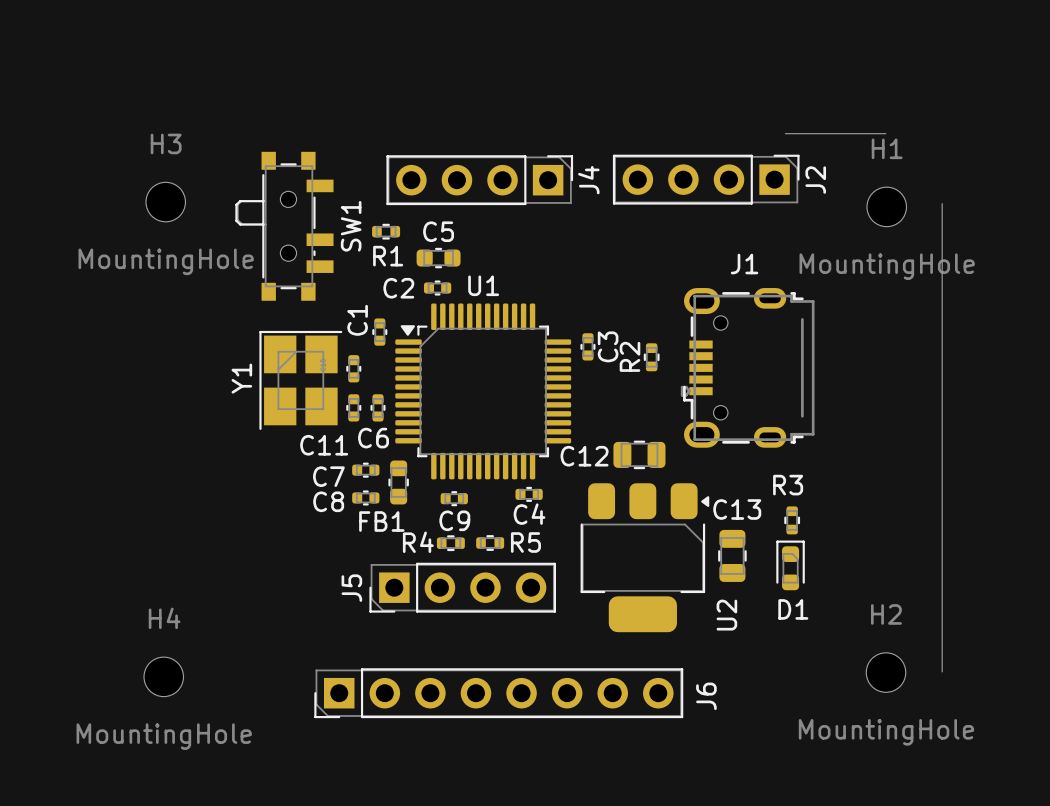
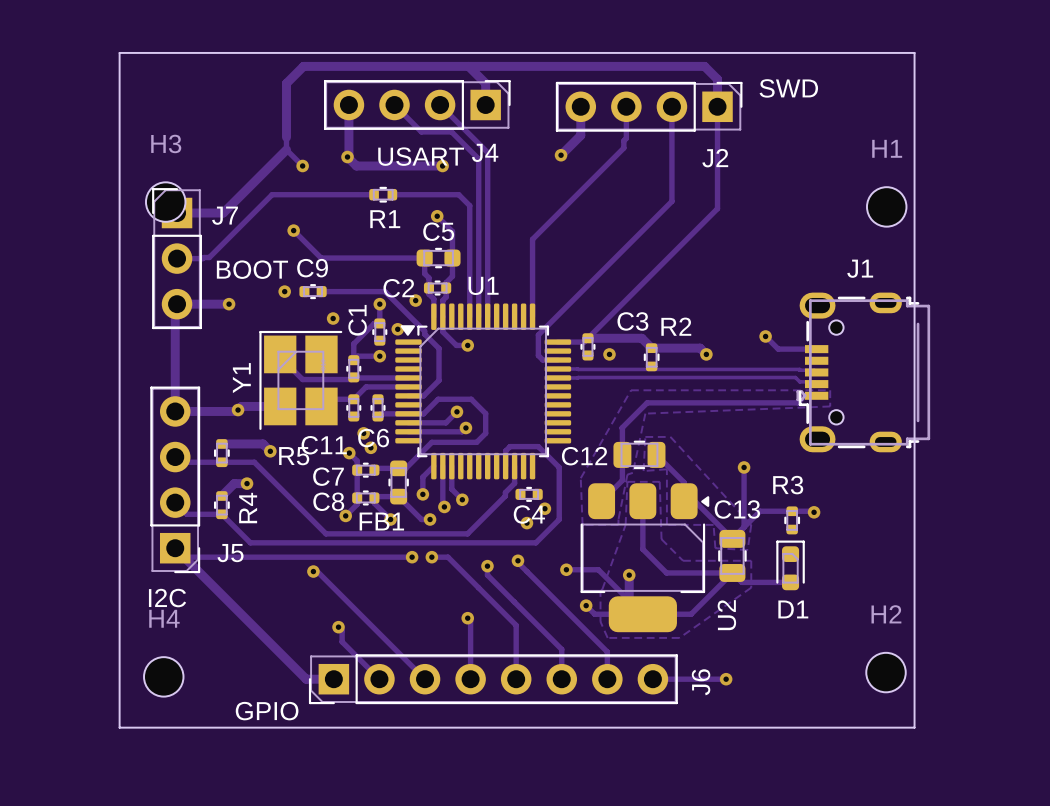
board edge: none -> (119, 52) (914, 52) (914, 727) (119, 727) (119, 52)
track: none -> (468, 66) (485, 83) (485, 104)
text: none -> SWD (788, 88)
track: none -> (348, 104) (347, 157) (356, 165) (442, 165)
track: none -> (394, 104) (421, 131) (451, 131) (478, 159) (478, 316)
track: none -> (440, 104) (487, 152) (487, 316)
track: none -> (580, 106) (580, 135) (561, 155)
track: none -> (626, 106) (626, 138) (623, 140) (623, 148) (532, 239) (532, 316)
track: none -> (671, 106) (671, 201) (538, 334) (538, 355) (542, 360) (557, 360)
board edge: (785, 133) (885, 133) -> none
track: none -> (286, 149) (302, 165)
track: none -> (286, 149) (286, 83) (303, 66) (704, 66) (717, 79) (717, 208) (584, 342) (557, 342)
track: none -> (286, 149) (223, 213) (177, 213)
via: none -> (561, 155)
text: none -> USART (421, 156)
via: none -> (347, 157)
via: none -> (302, 165)
via: none -> (442, 165)
J2 position: (706, 179) -> (649, 106)
J4 position: (479, 180) -> (417, 104)
J4 name rotation: 0° (588, 180) -> 90° clockwise (485, 152)
J4 name position: J4 (588, 180) -> J4 (485, 152)
J2 name rotation: 0° (815, 180) -> 90° clockwise (715, 158)
J2 name position: J2 (815, 180) -> J2 (715, 158)
track: none -> (374, 194) (272, 194) (209, 257) (177, 258)
track: none -> (392, 194) (458, 194) (469, 205) (469, 316)
board edge: (942, 203) (942, 671) -> none
track: none -> (437, 216) (452, 231) (452, 276) (446, 282) (446, 296) (442, 300) (442, 331) (456, 345) (467, 345)
via: none -> (437, 216)
SW1: (284, 226) -> none
track: none -> (293, 230) (321, 258) (424, 258) (424, 273) (428, 277) (428, 294) (433, 299) (433, 316)
via: none -> (293, 230)
R1 position: (386, 231) -> (383, 194)
J7: none -> (177, 258)
H3 value: MountingHole (166, 261) -> none
H1 value: MountingHole (887, 266) -> none
text: none -> BOOT (252, 269)
via: none -> (284, 291)
track: none -> (321, 291) (385, 291) (424, 331) (424, 334) (439, 348) (439, 380) (423, 395) (408, 395)
via: none -> (415, 300)
track: none -> (229, 304) (177, 304) (175, 305) (175, 411)
via: none -> (229, 304)
track: none -> (379, 304) (379, 323) (374, 323) (353, 343) (353, 360) (357, 356) (379, 356)
via: none -> (379, 304)
via: none -> (333, 318)
via: none -> (397, 329)
track: none -> (765, 336) (778, 349) (816, 349)
via: none -> (765, 336)
track: none -> (587, 338) (641, 338) (651, 348) (700, 348) (706, 354)
via: none -> (467, 345)
C3 name rotation: 0° (608, 346) -> 90° clockwise (632, 321)
track: none -> (280, 354) (280, 357) (302, 379) (408, 377)
via: none -> (609, 354)
via: none -> (706, 354)
via: none -> (379, 356)
R2 name rotation: 0° (629, 356) -> 90° clockwise (676, 326)
R2 name position: R2 (629, 356) -> R2 (676, 326)
J1 position: (747, 367) -> (863, 372)
track: none -> (557, 368) (799, 369) (814, 370) (816, 372)
track: none -> (557, 377) (795, 377) (799, 381) (814, 381) (816, 384)
track: none -> (408, 386) (366, 386) (353, 399) (328, 399) (321, 406)
zone outline: none -> (631, 390) (580, 478) (582, 524) (618, 524) (627, 474) (632, 472) (645, 413) (830, 406) (830, 390) (631, 390)
track: none -> (805, 395) (797, 402) (647, 402) (622, 427) (622, 480) (601, 501)
track: none -> (280, 406) (241, 406) (236, 411) (175, 411)
via: none -> (238, 410)
track: none -> (456, 411) (445, 422) (408, 422)
via: none -> (456, 411)
track: none -> (378, 416) (380, 413) (423, 413) (438, 399) (471, 399) (485, 413) (485, 433) (476, 442) (431, 442) (405, 468) (376, 468) (374, 470)
track: none -> (465, 427) (462, 431) (408, 431)
via: none -> (465, 427)
via: none -> (363, 433)
zone outline: none -> (645, 436) (643, 471) (666, 469) (666, 524) (713, 524) (715, 548) (747, 550) (751, 524) (670, 436) (645, 436)
track: none -> (221, 443) (262, 443) (270, 451)
via: none -> (370, 447)
via: none -> (270, 451)
track: none -> (349, 453) (357, 461) (357, 504) (345, 515)
via: none -> (349, 453)
track: none -> (656, 454) (684, 482) (684, 501) (694, 501) (732, 538) (760, 511) (814, 512)
track: none -> (175, 457) (180, 462) (254, 462) (325, 533) (467, 533) (505, 496) (505, 492) (514, 483) (514, 466)
track: none -> (433, 466) (422, 477) (422, 494)
track: none -> (442, 466) (442, 505) (444, 506)
track: none -> (451, 466) (451, 489) (462, 499)
track: none -> (505, 466) (505, 451) (510, 446) (538, 446) (559, 467) (559, 519) (535, 542) (250, 542) (221, 514) (186, 514) (175, 502)
track: none -> (744, 467) (744, 527)
via: none -> (744, 467)
zone outline: none -> (627, 481) (659, 481) (661, 539) (683, 560) (751, 560) (751, 587) (679, 637) (607, 637) (600, 621) (600, 591) (625, 524) (627, 481)
track: none -> (247, 483) (234, 483) (221, 495)
via: none -> (247, 483)
via: none -> (422, 494)
C9 position: (454, 498) -> (313, 291)
via: none -> (462, 499)
track: none -> (642, 501) (642, 549) (666, 572) (732, 572)
via: none -> (444, 506)
via: none -> (544, 508)
via: none -> (814, 512)
via: none -> (345, 515)
track: none -> (390, 519) (374, 503) (375, 496) (398, 496) (421, 519) (430, 519)
via: none -> (390, 519)
via: none -> (430, 519)
C9 name position: C9 (454, 520) -> C9 (312, 268)
via: none -> (526, 523)
R4 name position: R4 (418, 542) -> R4 (248, 508)
R5 name position: R5 (525, 542) -> R5 (294, 456)
R4 rotation: 0° (450, 543) -> 90° clockwise (221, 505)
R4 position: (450, 543) -> (221, 505)
R5 rotation: 0° (490, 543) -> 90° clockwise (221, 453)
R5 position: (490, 543) -> (221, 453)
track: none -> (412, 557) (184, 557) (175, 548) (306, 679) (333, 679)
via: none -> (412, 557)
track: none -> (431, 557) (447, 557) (516, 625) (516, 679)
via: none -> (431, 557)
track: none -> (517, 560) (607, 651) (607, 679)
via: none -> (517, 560)
track: none -> (487, 566) (487, 575) (561, 649) (561, 679)
via: none -> (487, 566)
track: none -> (566, 569) (598, 569) (642, 614) (629, 600) (629, 575)
via: none -> (566, 569)
track: none -> (313, 571) (317, 571) (425, 679)
via: none -> (313, 571)
track: none -> (732, 572) (741, 582) (790, 582)
track: none -> (732, 572) (691, 614) (594, 614) (586, 605)
via: none -> (629, 575)
J5 rotation: 0° (462, 587) -> 90° counterclockwise (175, 479)
J5 position: (462, 587) -> (175, 479)
J5 name position: J5 (351, 588) -> J5 (230, 553)
text: none -> I2C (167, 598)
via: none -> (586, 605)
track: none -> (467, 618) (470, 621) (470, 679)
via: none -> (467, 618)
track: none -> (338, 627) (342, 630) (342, 641) (379, 679)
via: none -> (338, 627)
track: none -> (652, 679) (726, 679)
via: none -> (726, 679)
J6 position: (498, 693) -> (493, 679)
text: none -> GPIO (267, 711)
H2 value: MountingHole (886, 732) -> none
H4 value: MountingHole (164, 736) -> none

